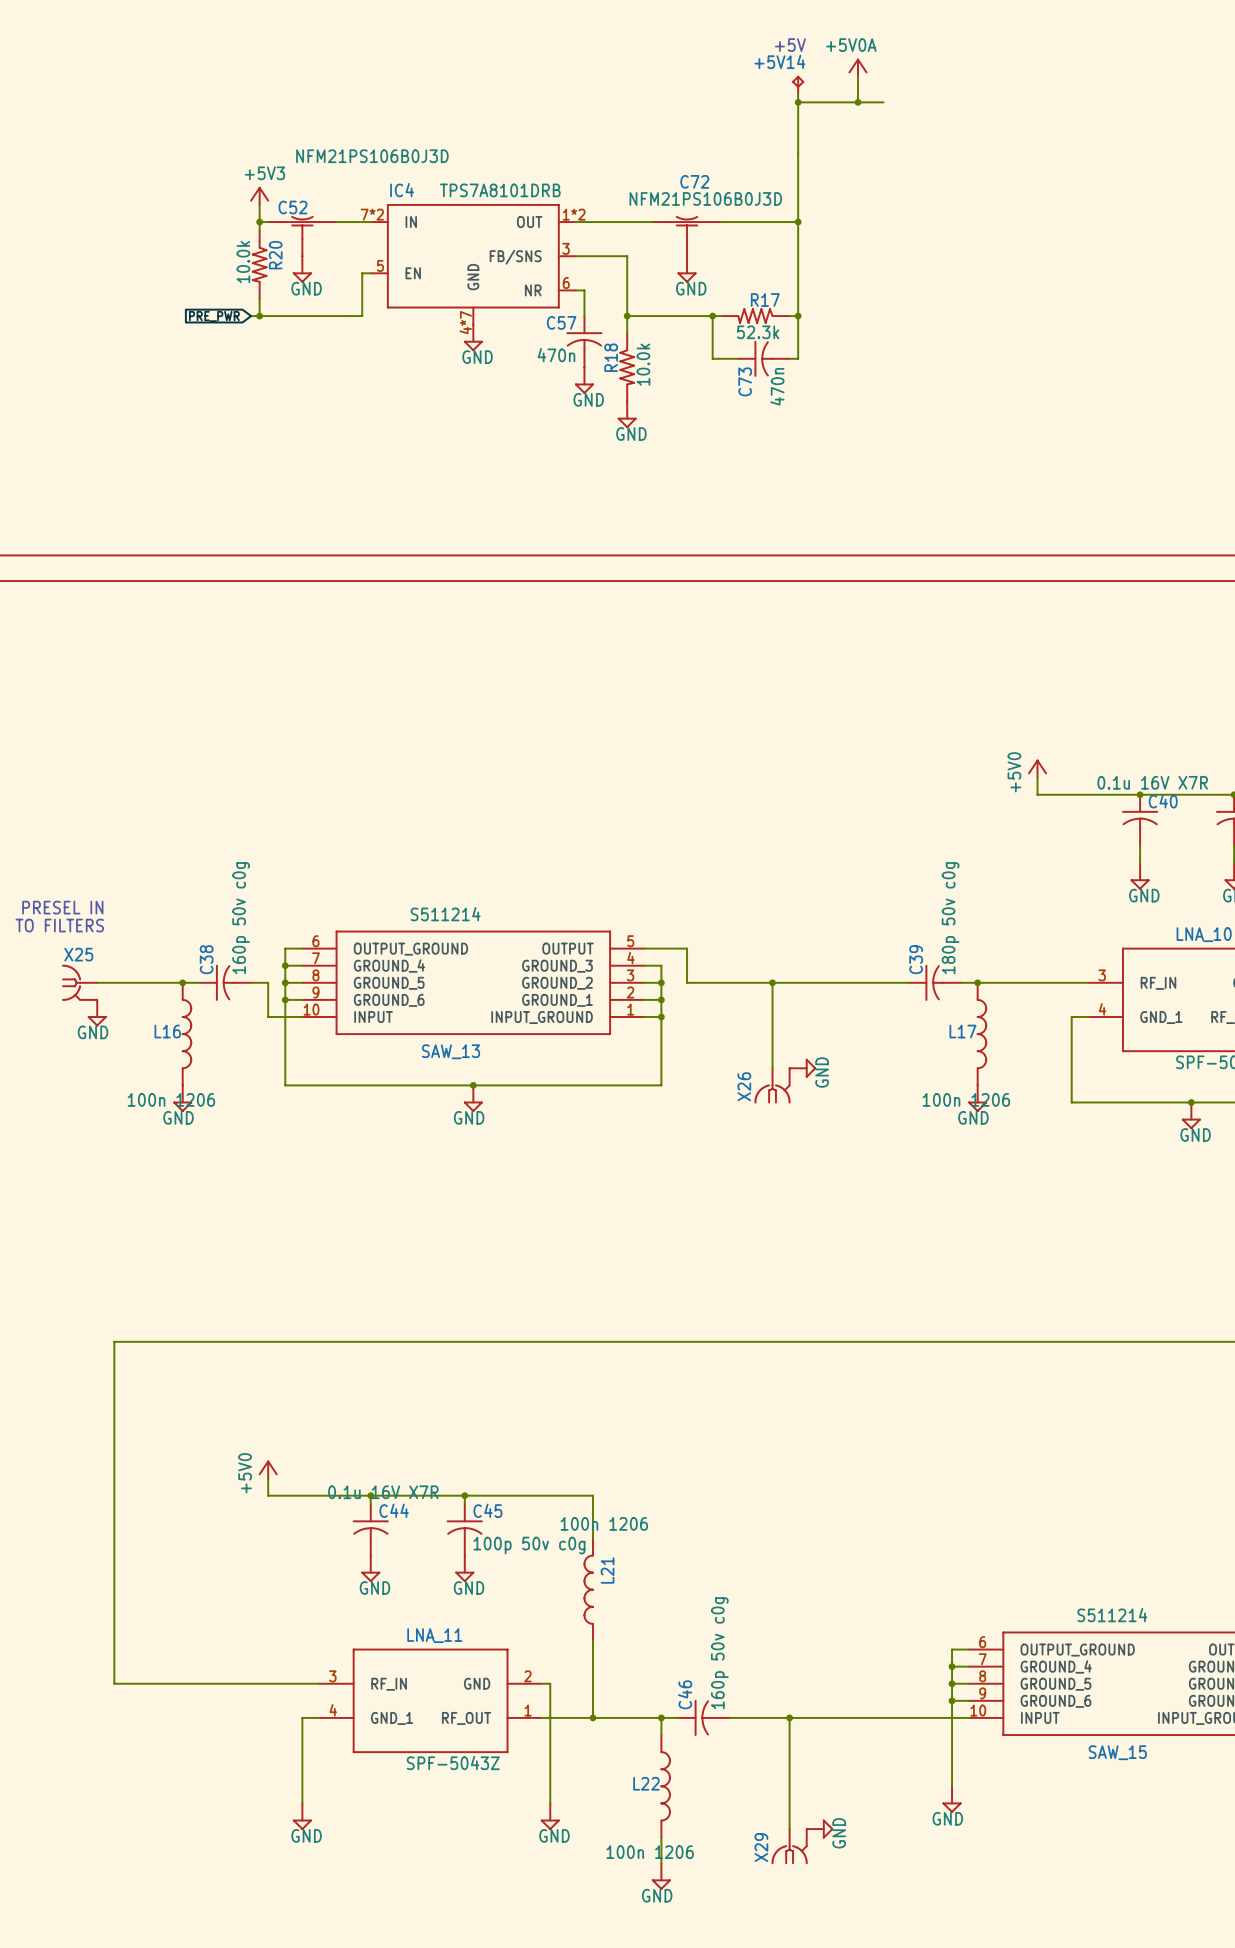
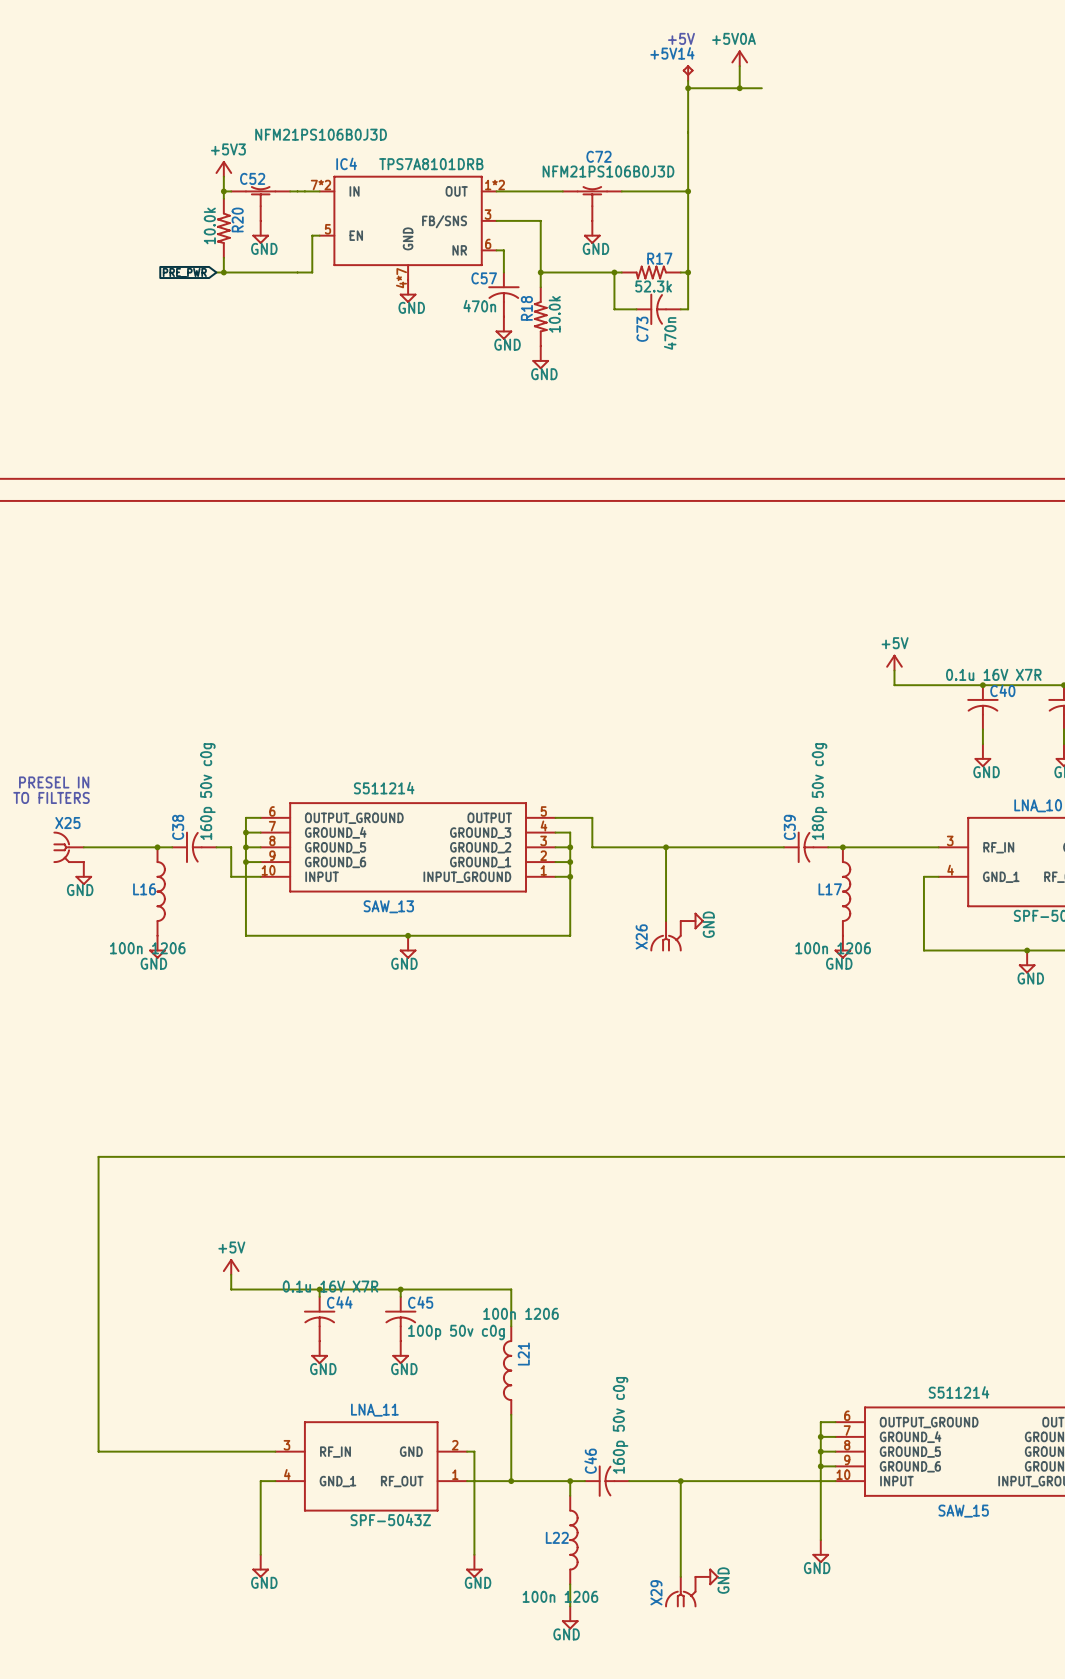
power symbol: +5V0 (1037, 768) -> +5V (894, 662)
power symbol: +5V0 (268, 1469) -> +5V (231, 1267)

